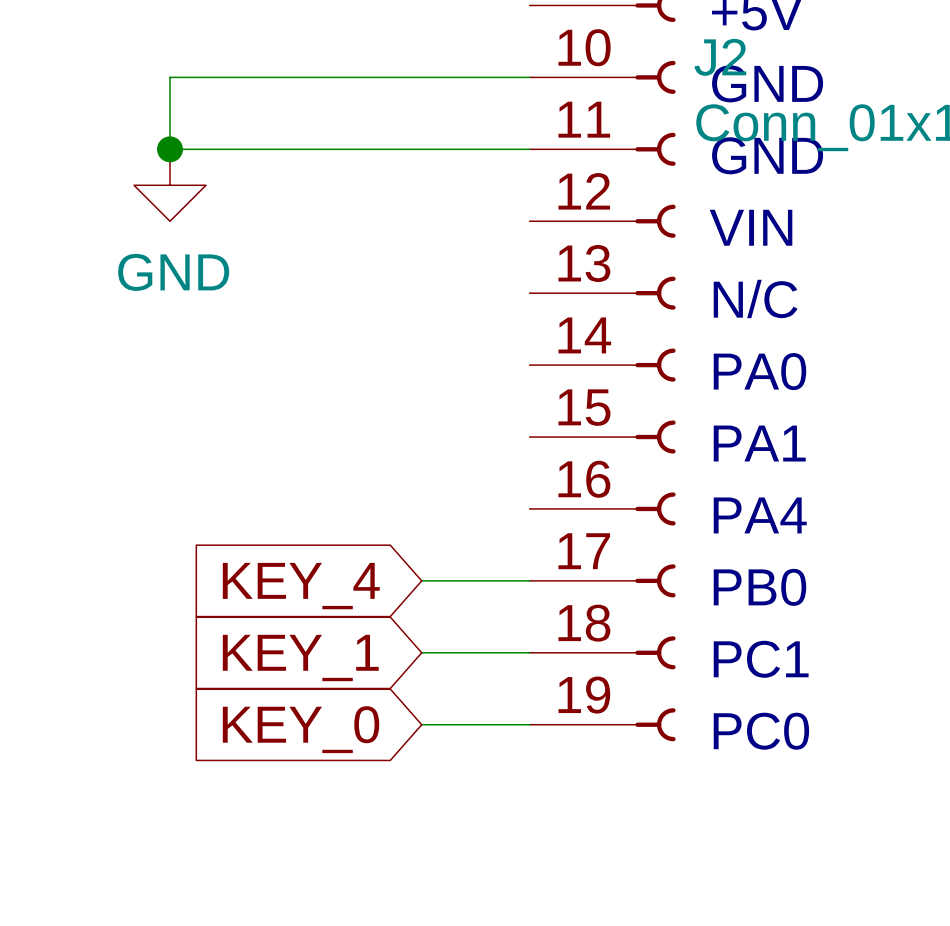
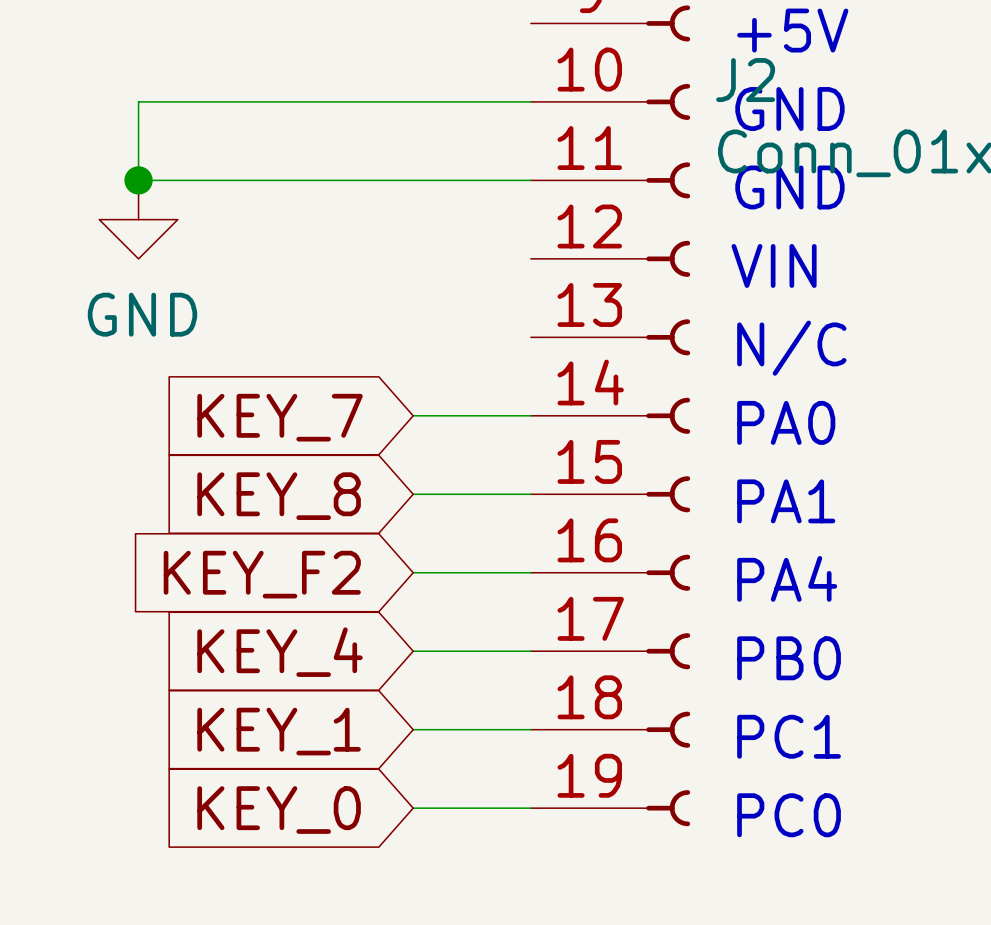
wire: none -> (413, 415) (530, 415)
global label: none -> KEY_7 (280, 417)
wire: none -> (413, 494) (530, 494)
global label: none -> KEY_8 (279, 496)
wire: none -> (413, 572) (530, 572)
global label: none -> KEY_F2 (262, 574)

